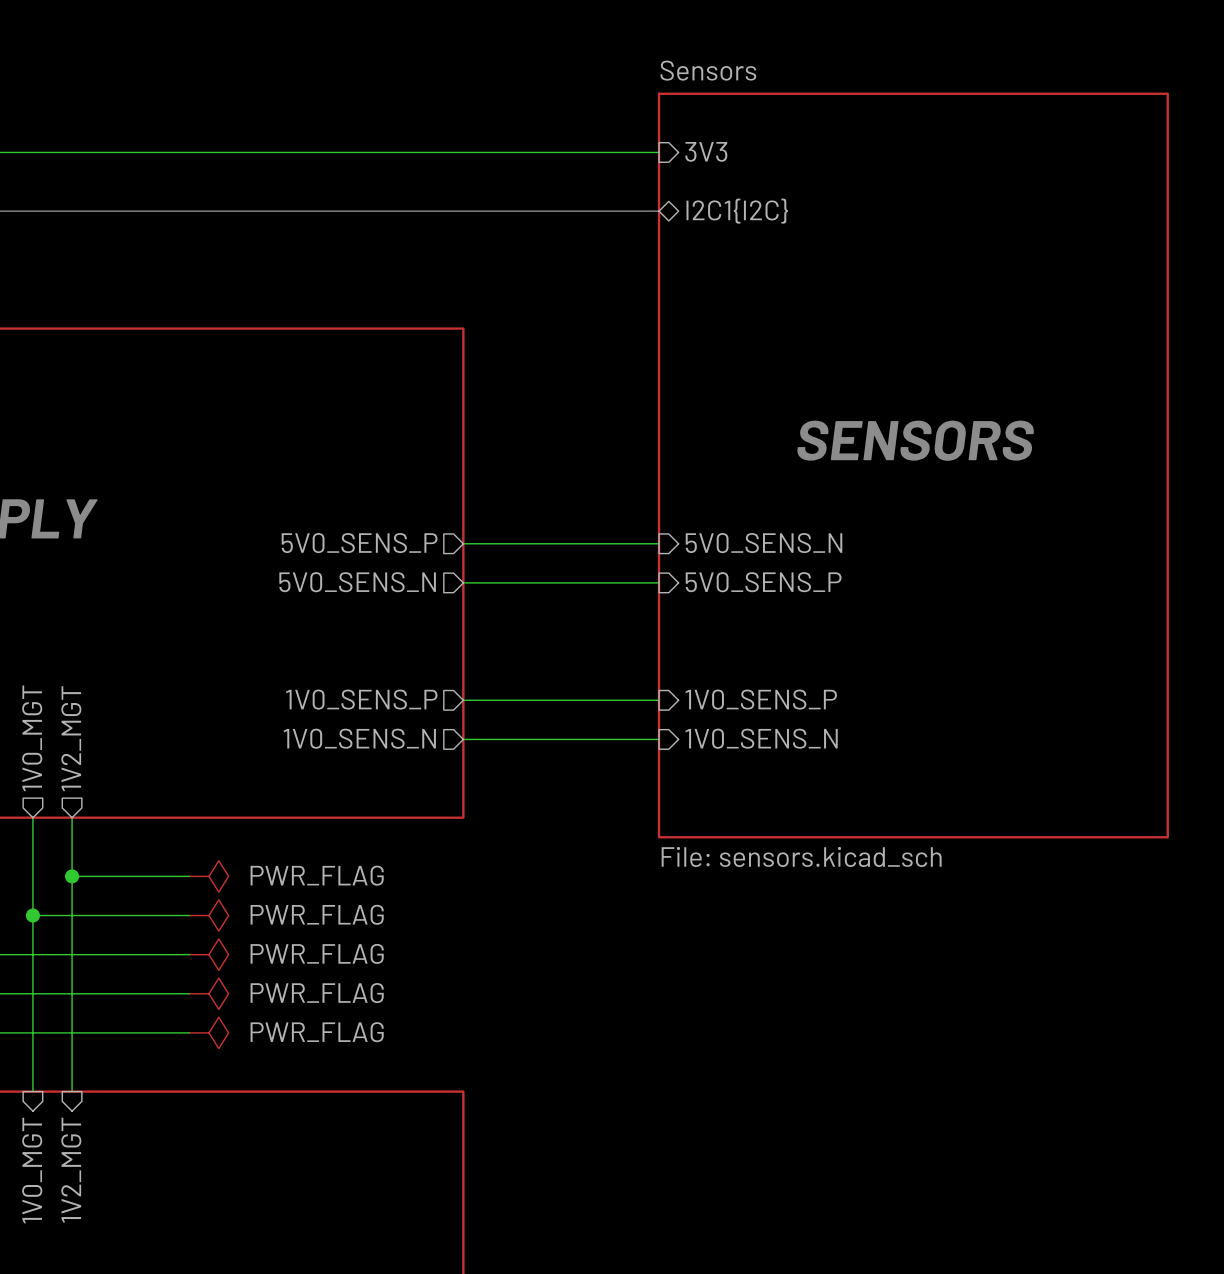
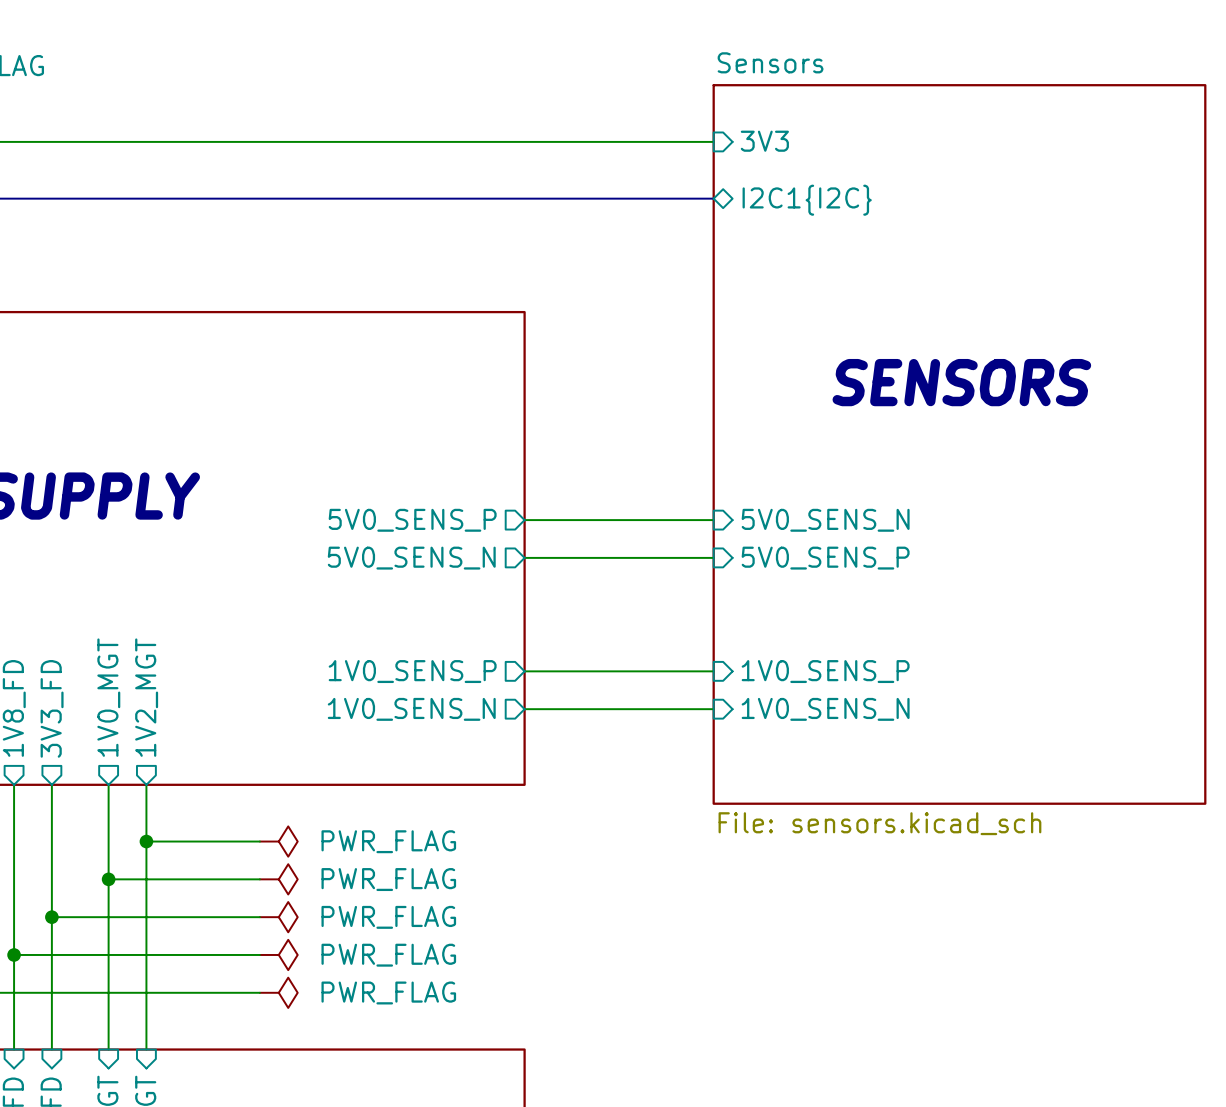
text position: SENSORS (915, 440) -> SENSORS (961, 382)

